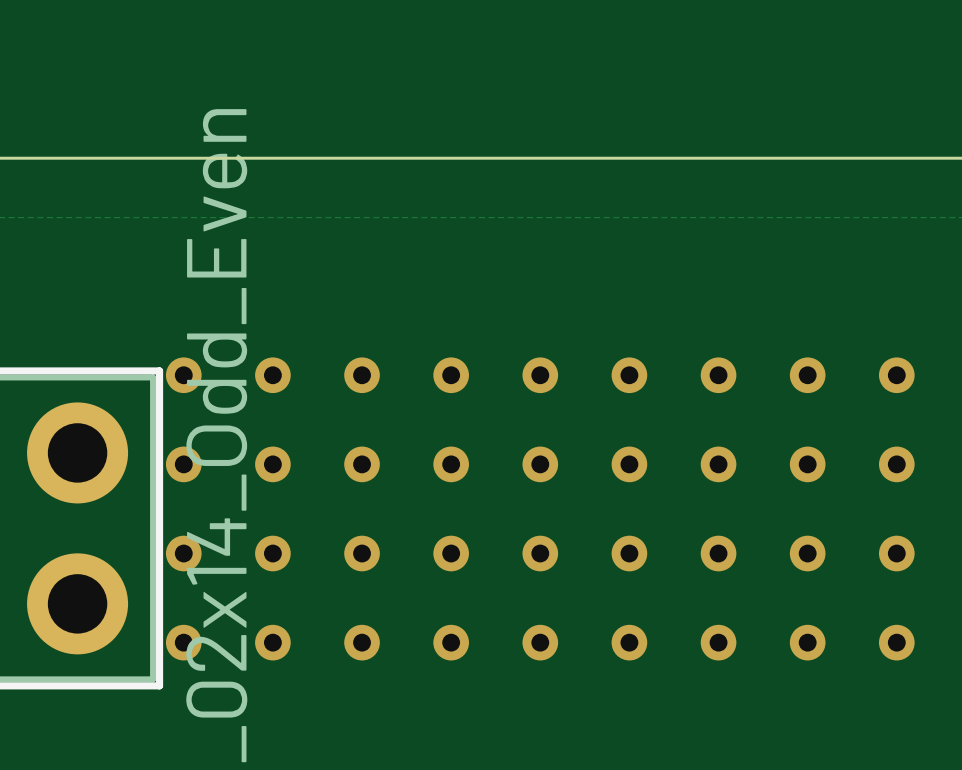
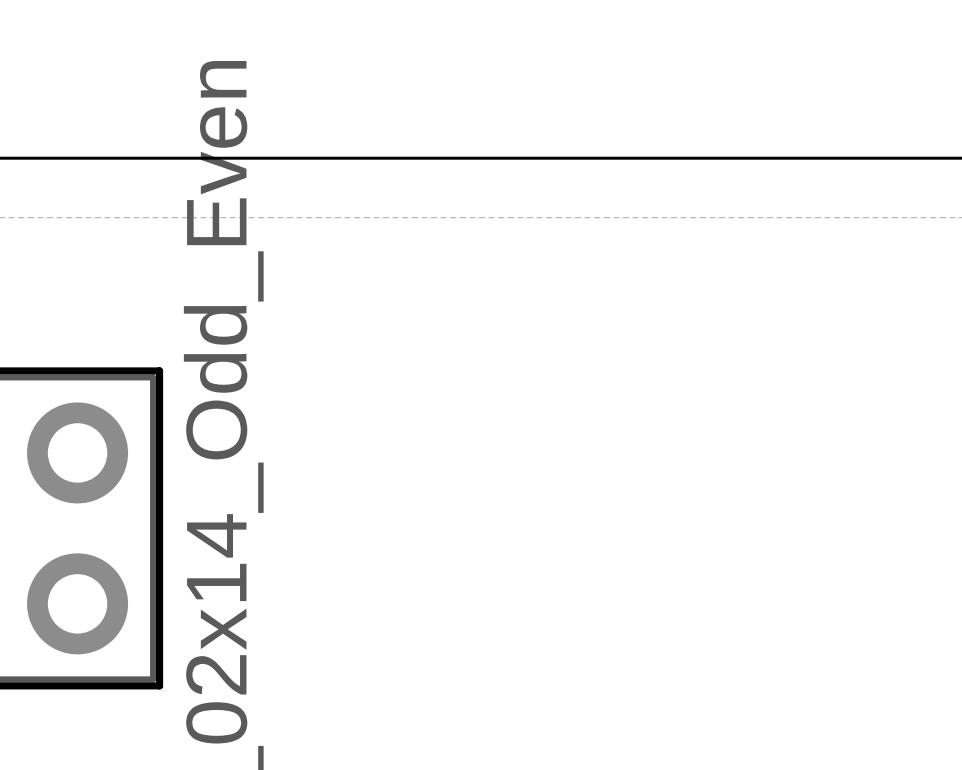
via: (183, 375) -> none
via: (272, 375) -> none
via: (362, 375) -> none
via: (451, 375) -> none
via: (540, 375) -> none
via: (629, 375) -> none
via: (718, 375) -> none
via: (807, 375) -> none
via: (896, 375) -> none
via: (183, 464) -> none
via: (272, 464) -> none
via: (362, 464) -> none
via: (451, 464) -> none
via: (540, 464) -> none
via: (629, 464) -> none
via: (718, 464) -> none
via: (807, 464) -> none
via: (896, 464) -> none
via: (183, 553) -> none
via: (272, 553) -> none
via: (362, 553) -> none
via: (451, 553) -> none
via: (540, 553) -> none
via: (629, 553) -> none
via: (718, 553) -> none
via: (807, 553) -> none
via: (896, 553) -> none
via: (183, 642) -> none
via: (272, 642) -> none
via: (362, 642) -> none
via: (451, 642) -> none
via: (540, 642) -> none
via: (629, 642) -> none
via: (718, 642) -> none
via: (807, 642) -> none
via: (896, 642) -> none

